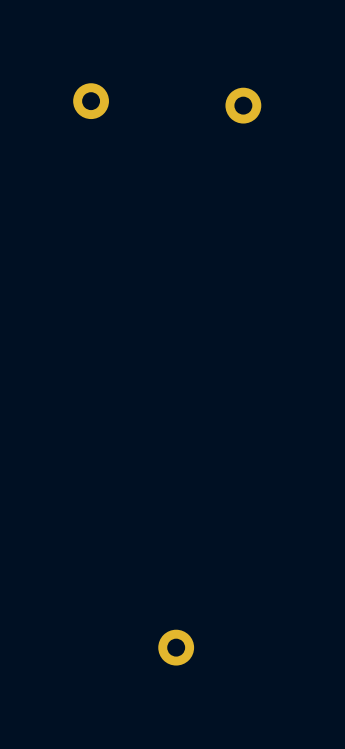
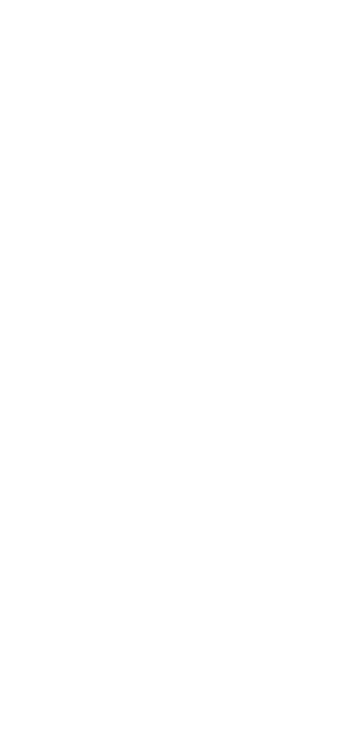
part: (91, 101) -> none
part: (243, 105) -> none
part: (176, 647) -> none

